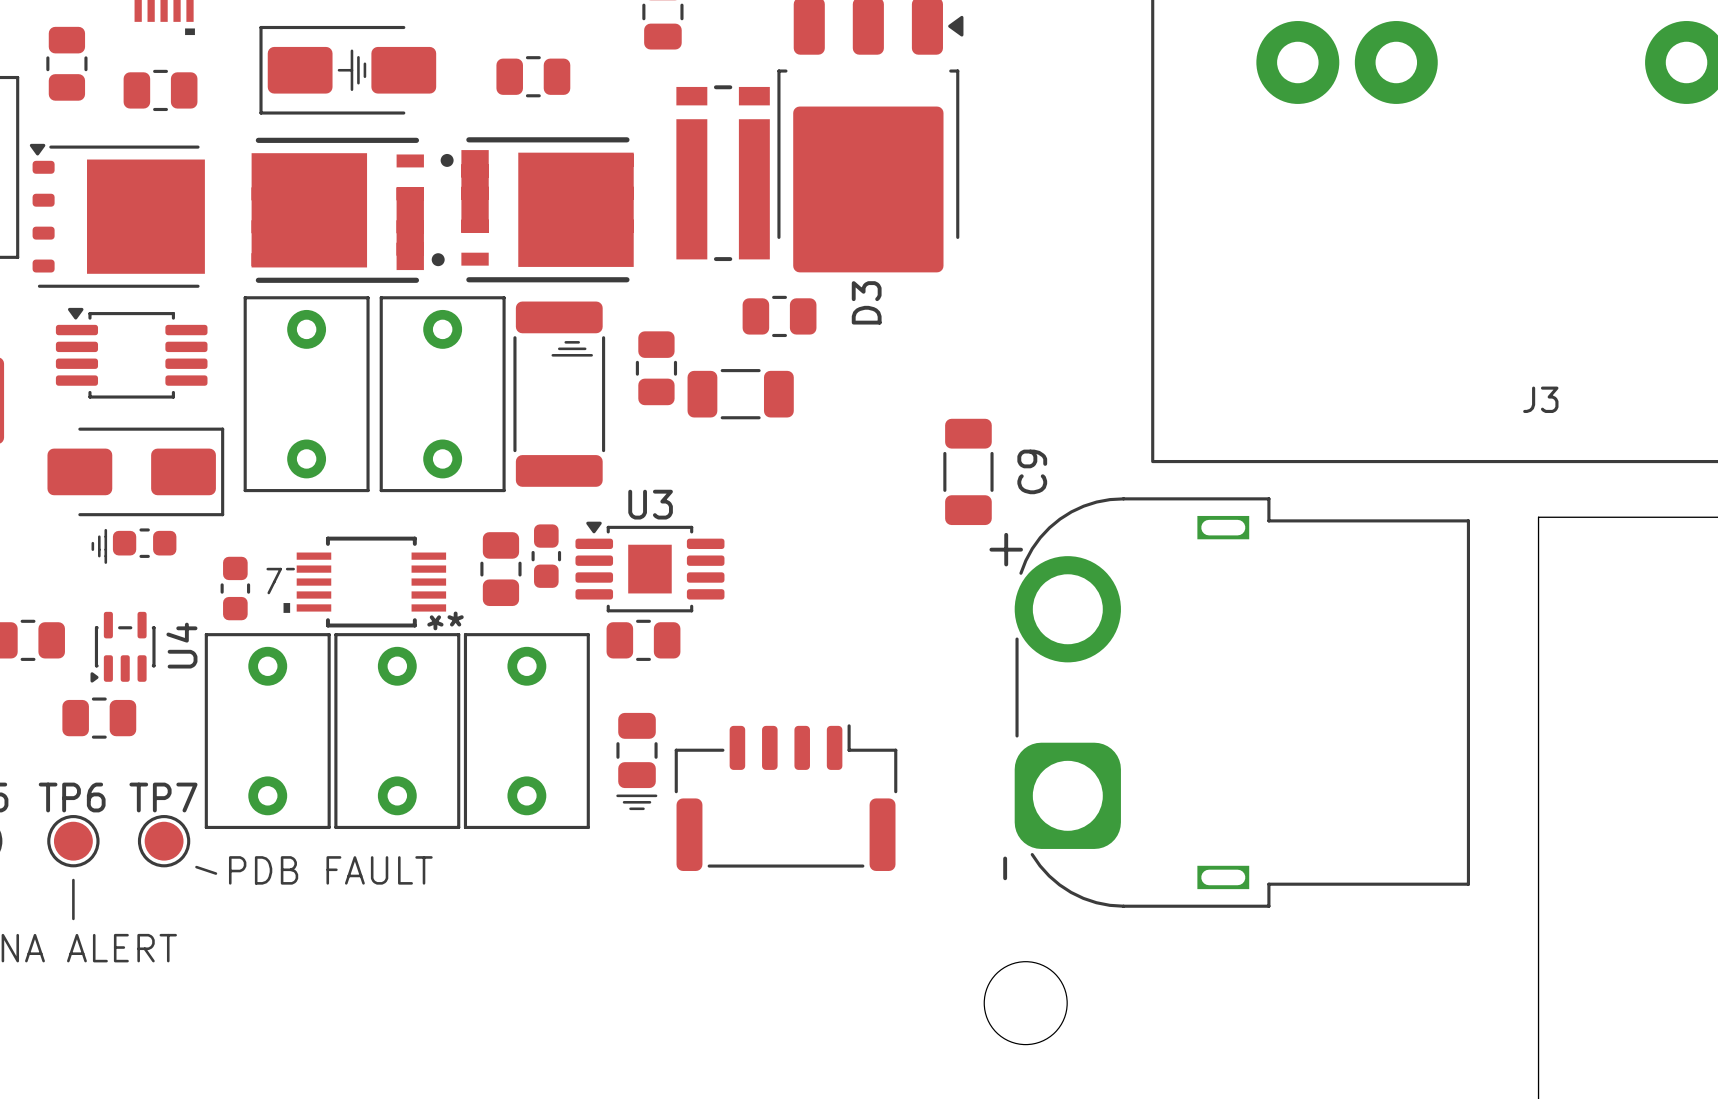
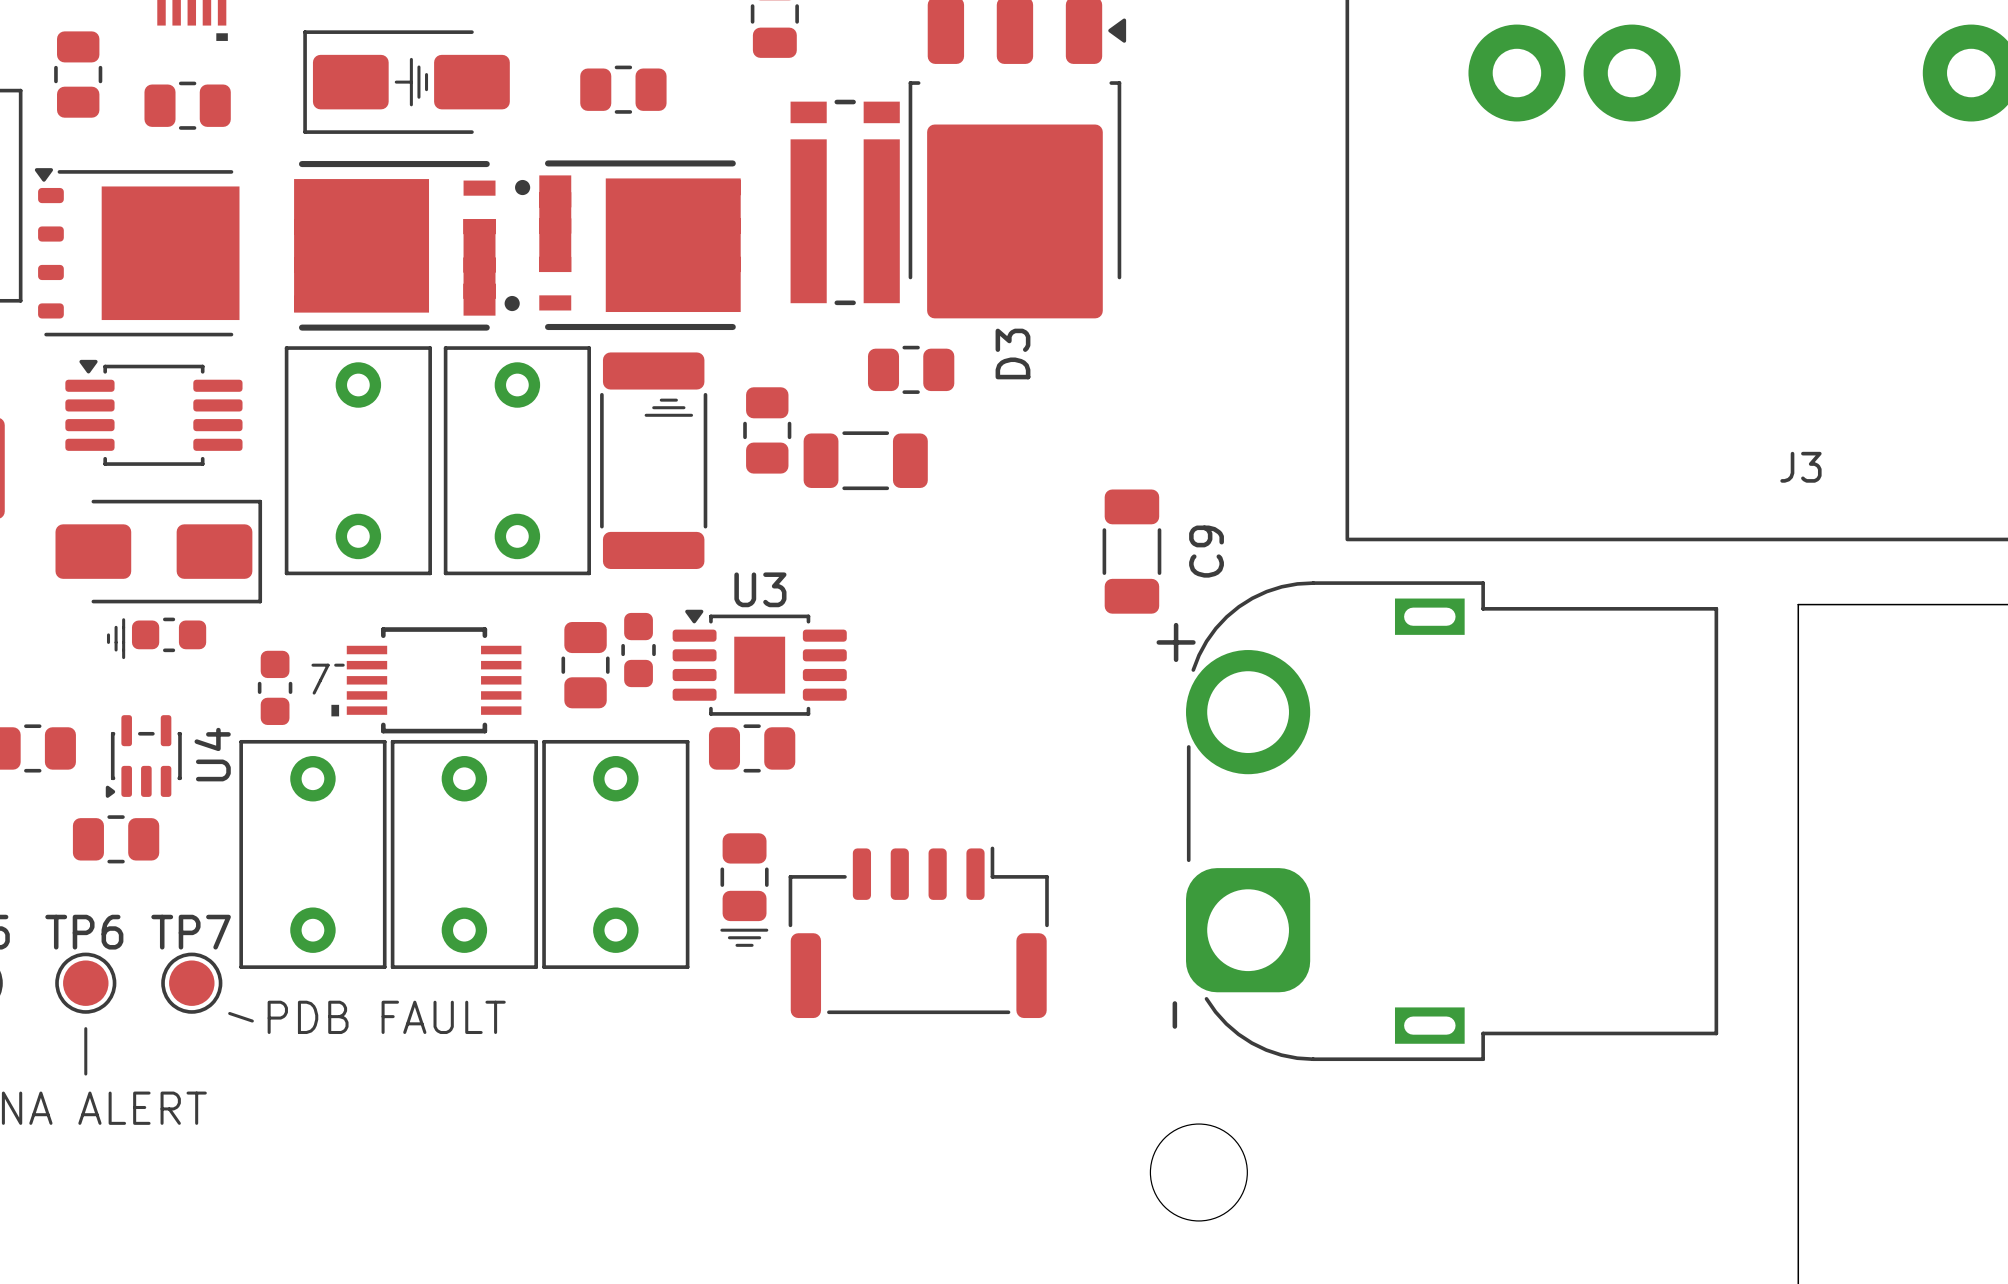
part footprint: [1014, 497, 1470, 908] -> [1186, 581, 1719, 1062]
part text: * (455, 619) -> none
part text: * (435, 622) -> none

